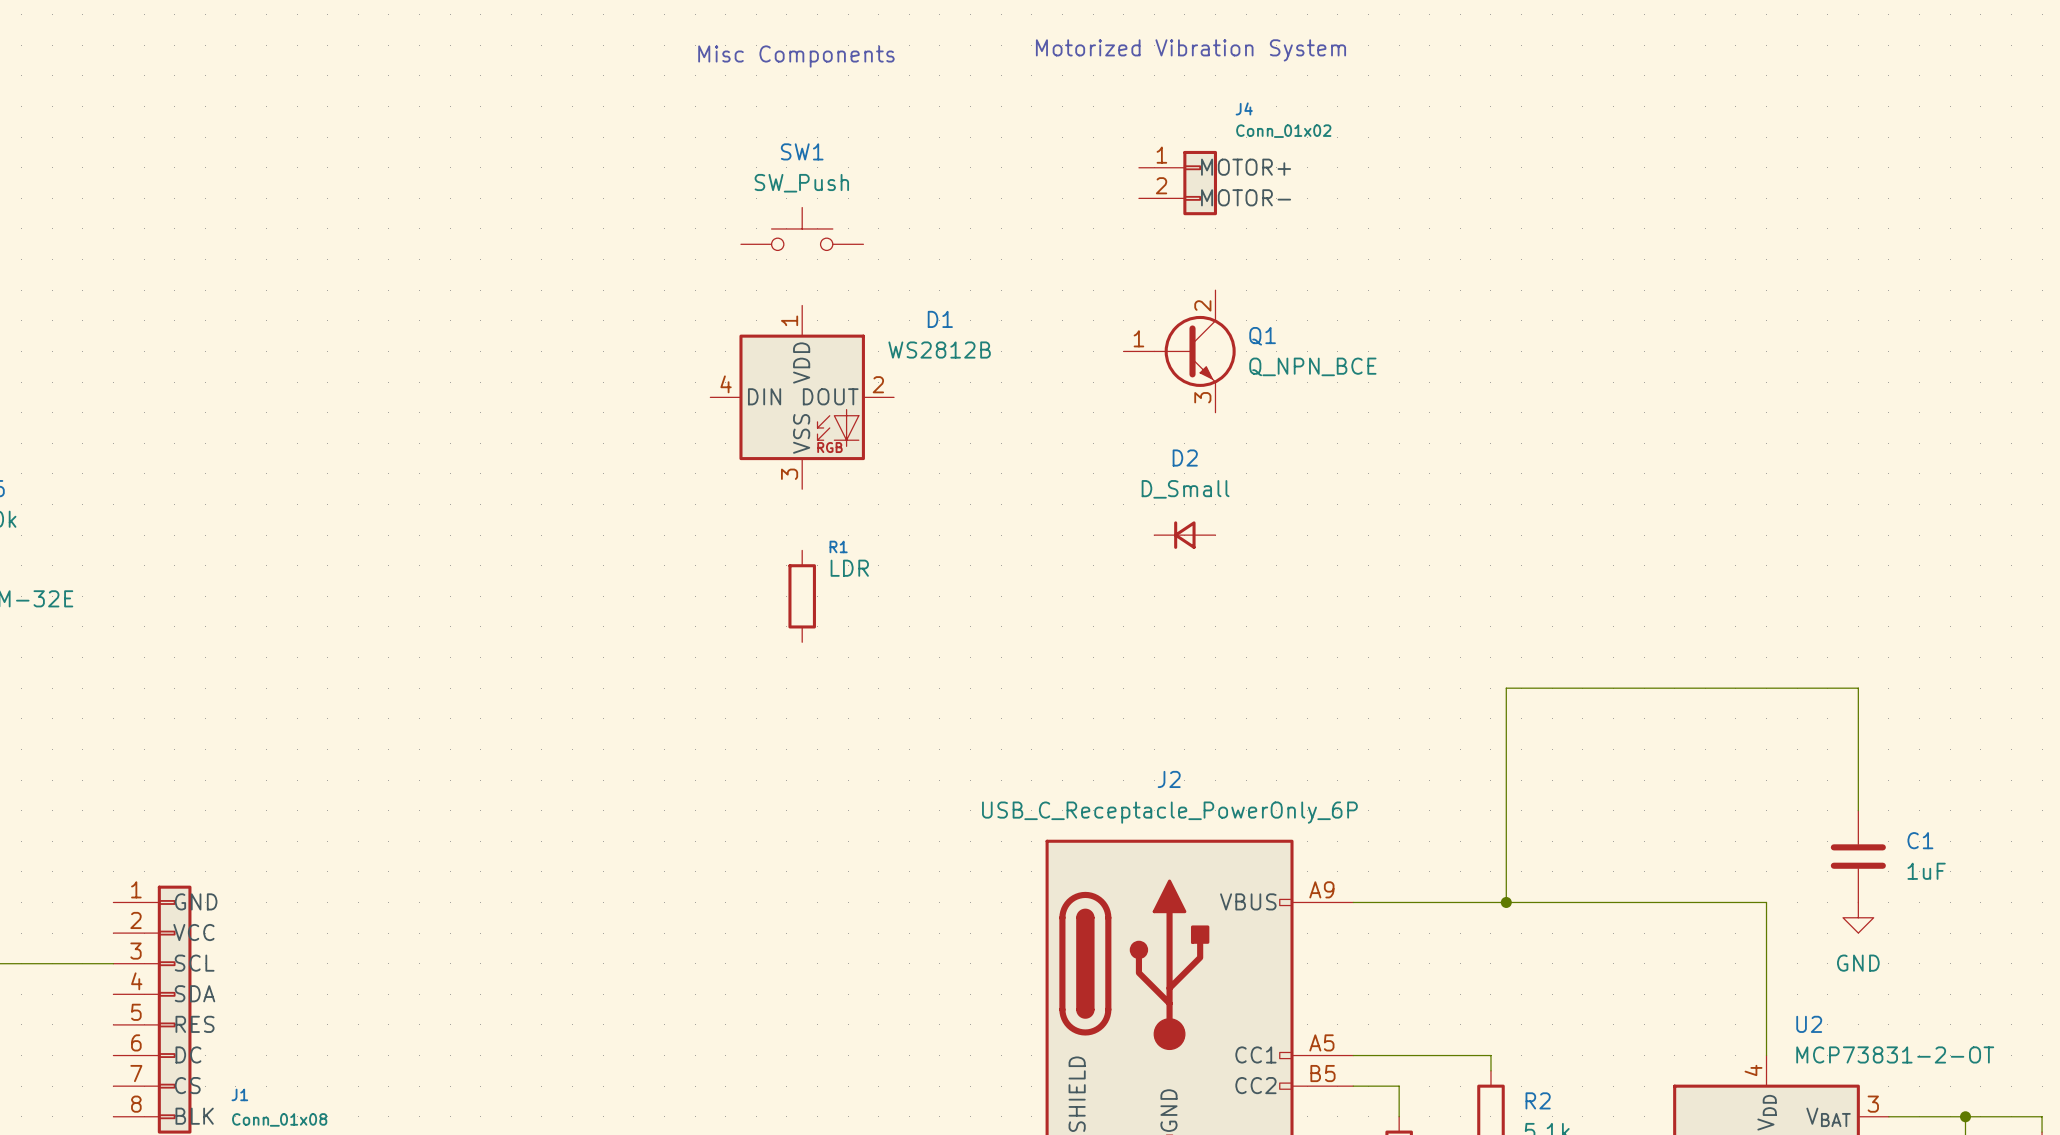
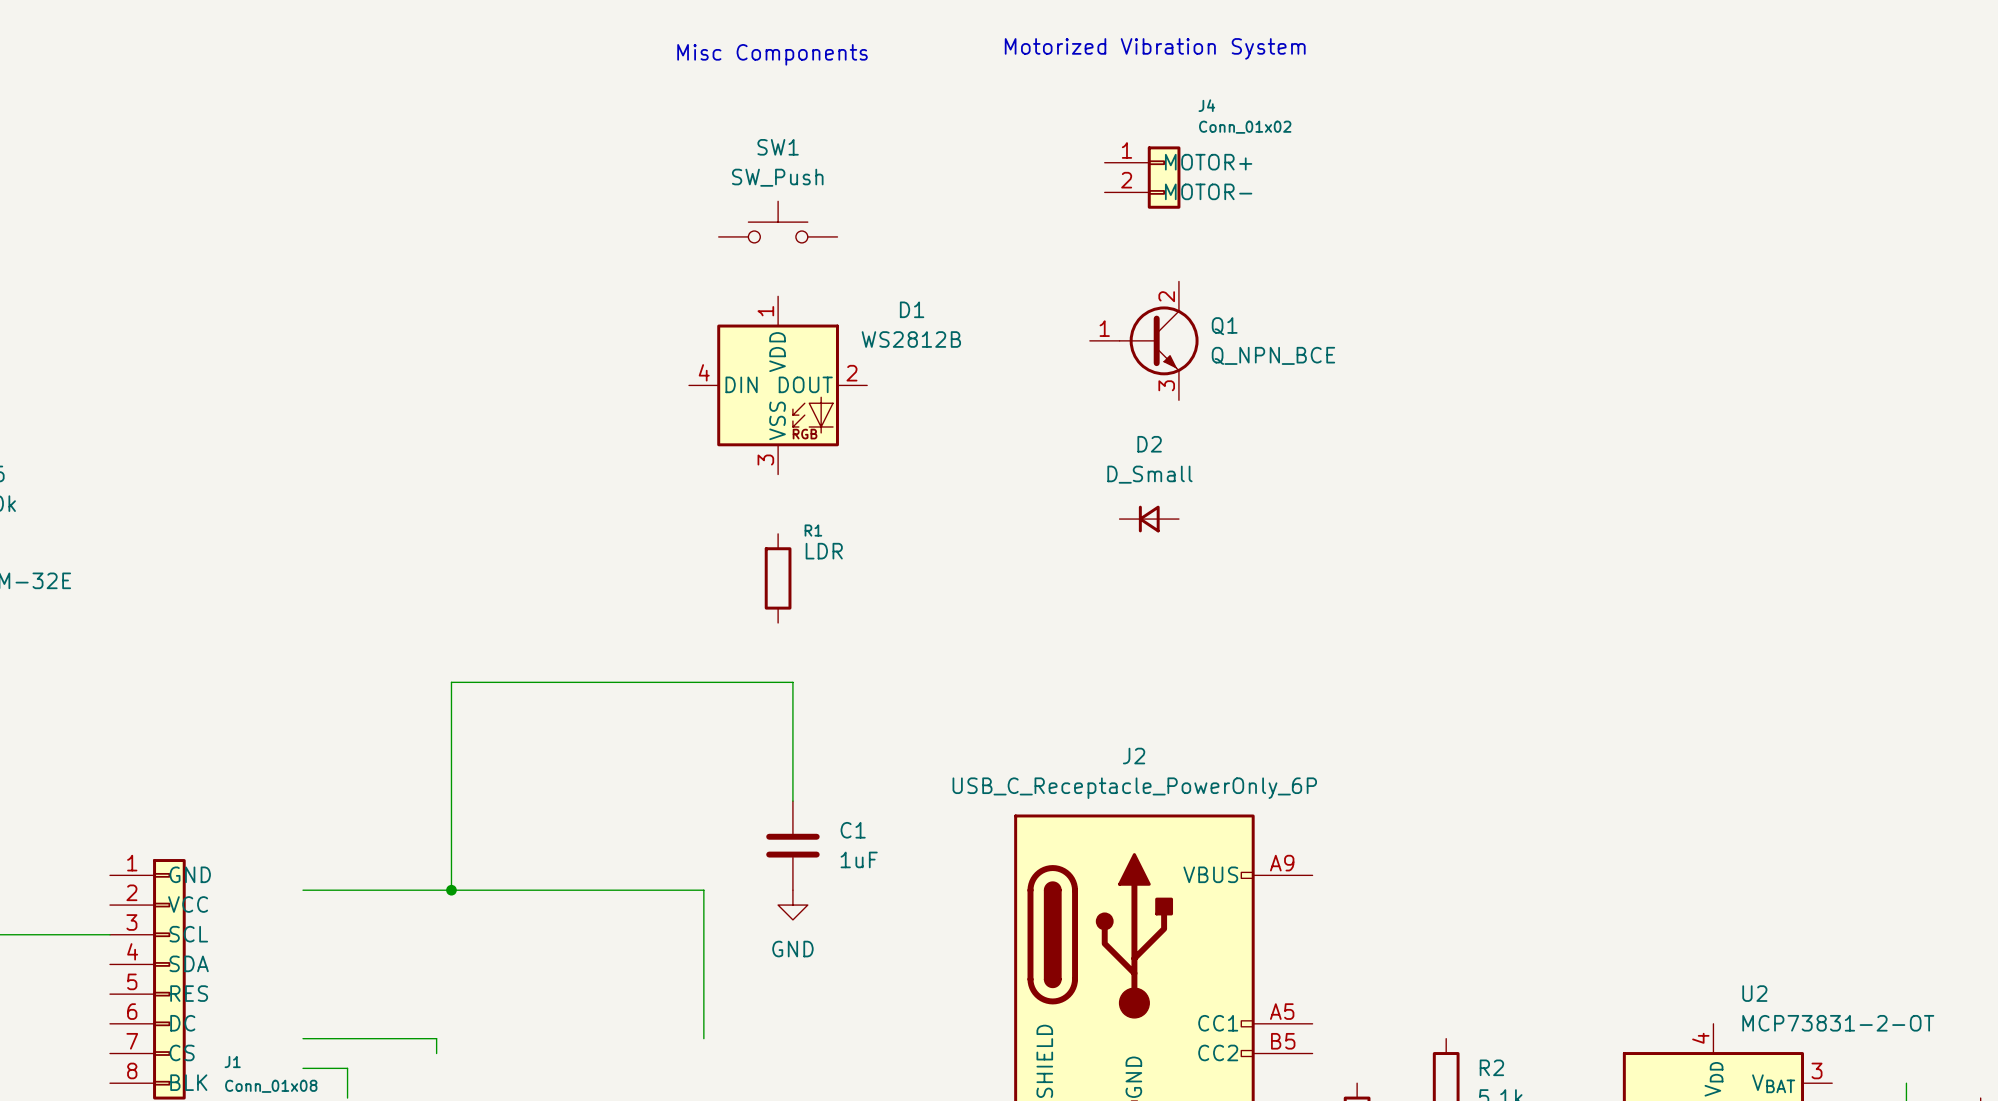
wire: (1858, 810) (1858, 688) (1506, 688) (1506, 902) -> none
wire: none -> (792, 801) (792, 682) (451, 682) (451, 890)
C1 position: (1858, 856) -> (792, 845)
wire: (1353, 902) (1766, 902) (1766, 1055) -> none
junction: (1506, 902) -> none
wire: none -> (303, 890) (703, 890) (703, 1038)
junction: none -> (451, 890)
power symbol: GND (1858, 917) -> none
power symbol: none -> GND (792, 905)
wire: (1353, 1055) (1490, 1055) (1490, 1070) -> none
wire: none -> (303, 1038) (436, 1038) (436, 1053)
wire: (1353, 1086) (1399, 1086) (1399, 1116) -> none
wire: none -> (303, 1068) (347, 1068) (347, 1098)
wire: (1888, 1116) (2042, 1116) (2042, 1132) -> none
junction: (1965, 1116) -> none

